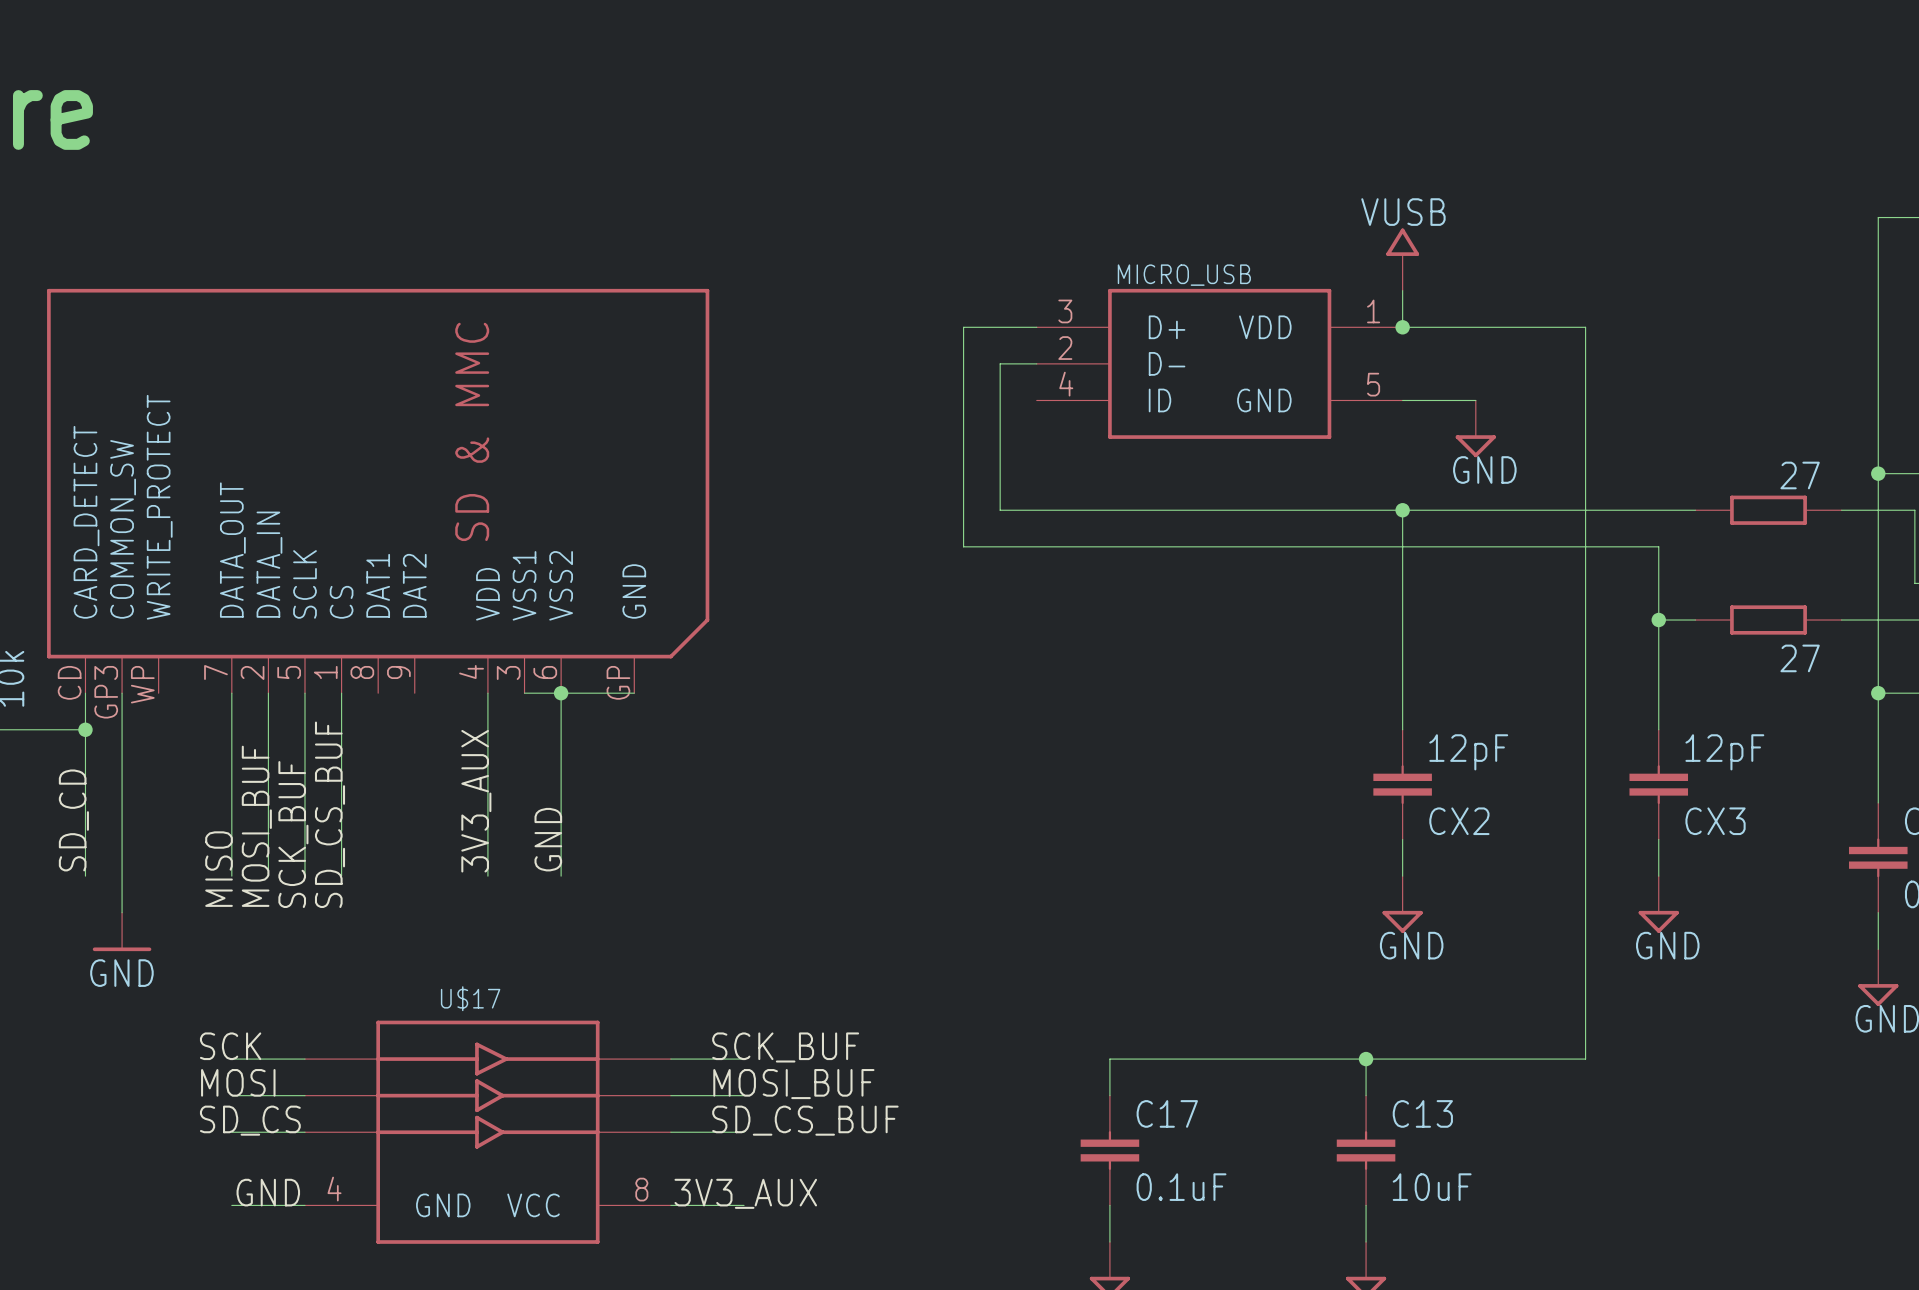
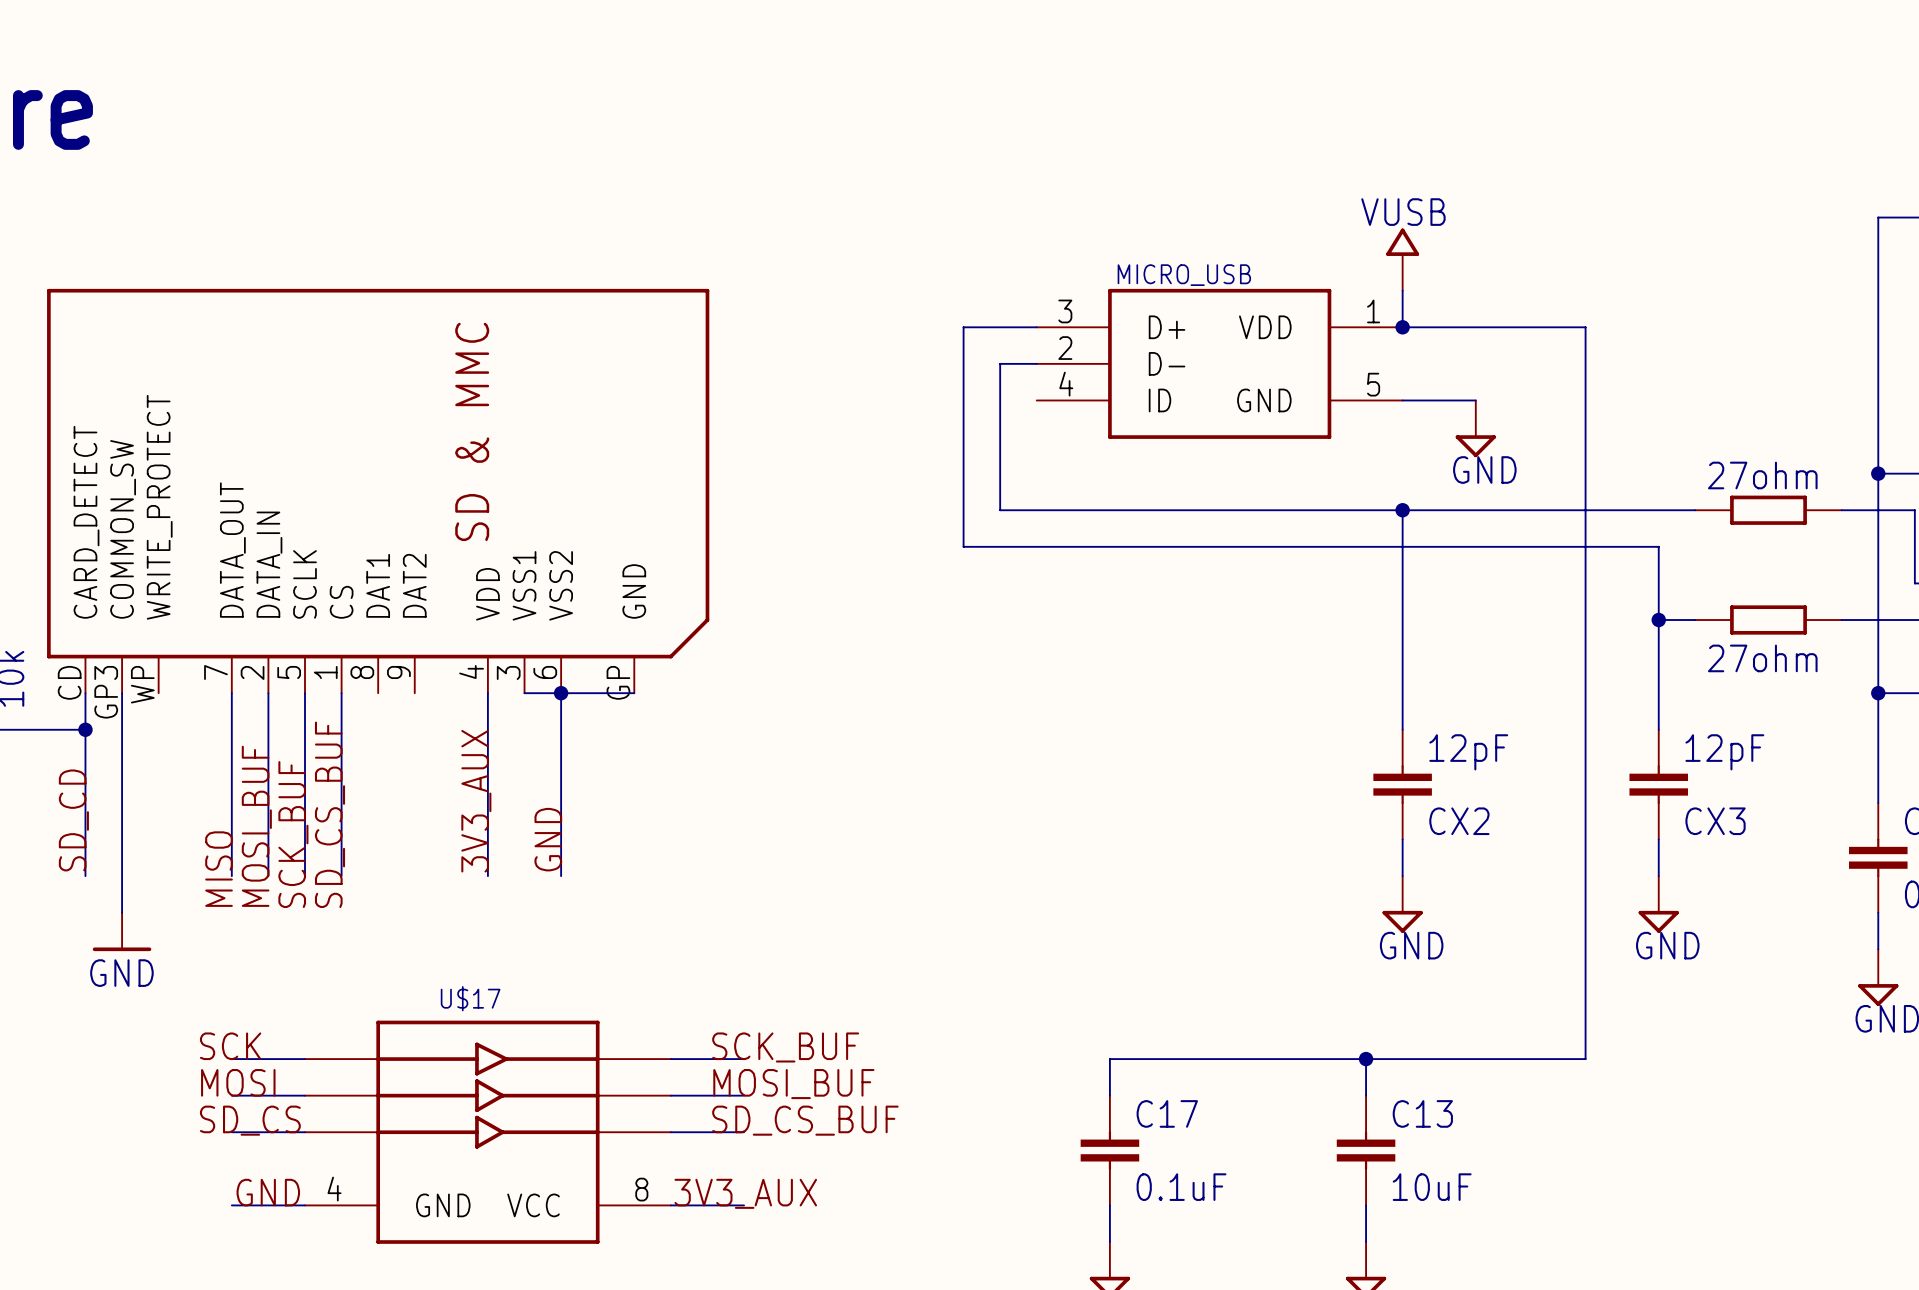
part value: 27 (1800, 475) -> 27ohm (1762, 475)
part value: 27 (1800, 658) -> 27ohm (1762, 658)

